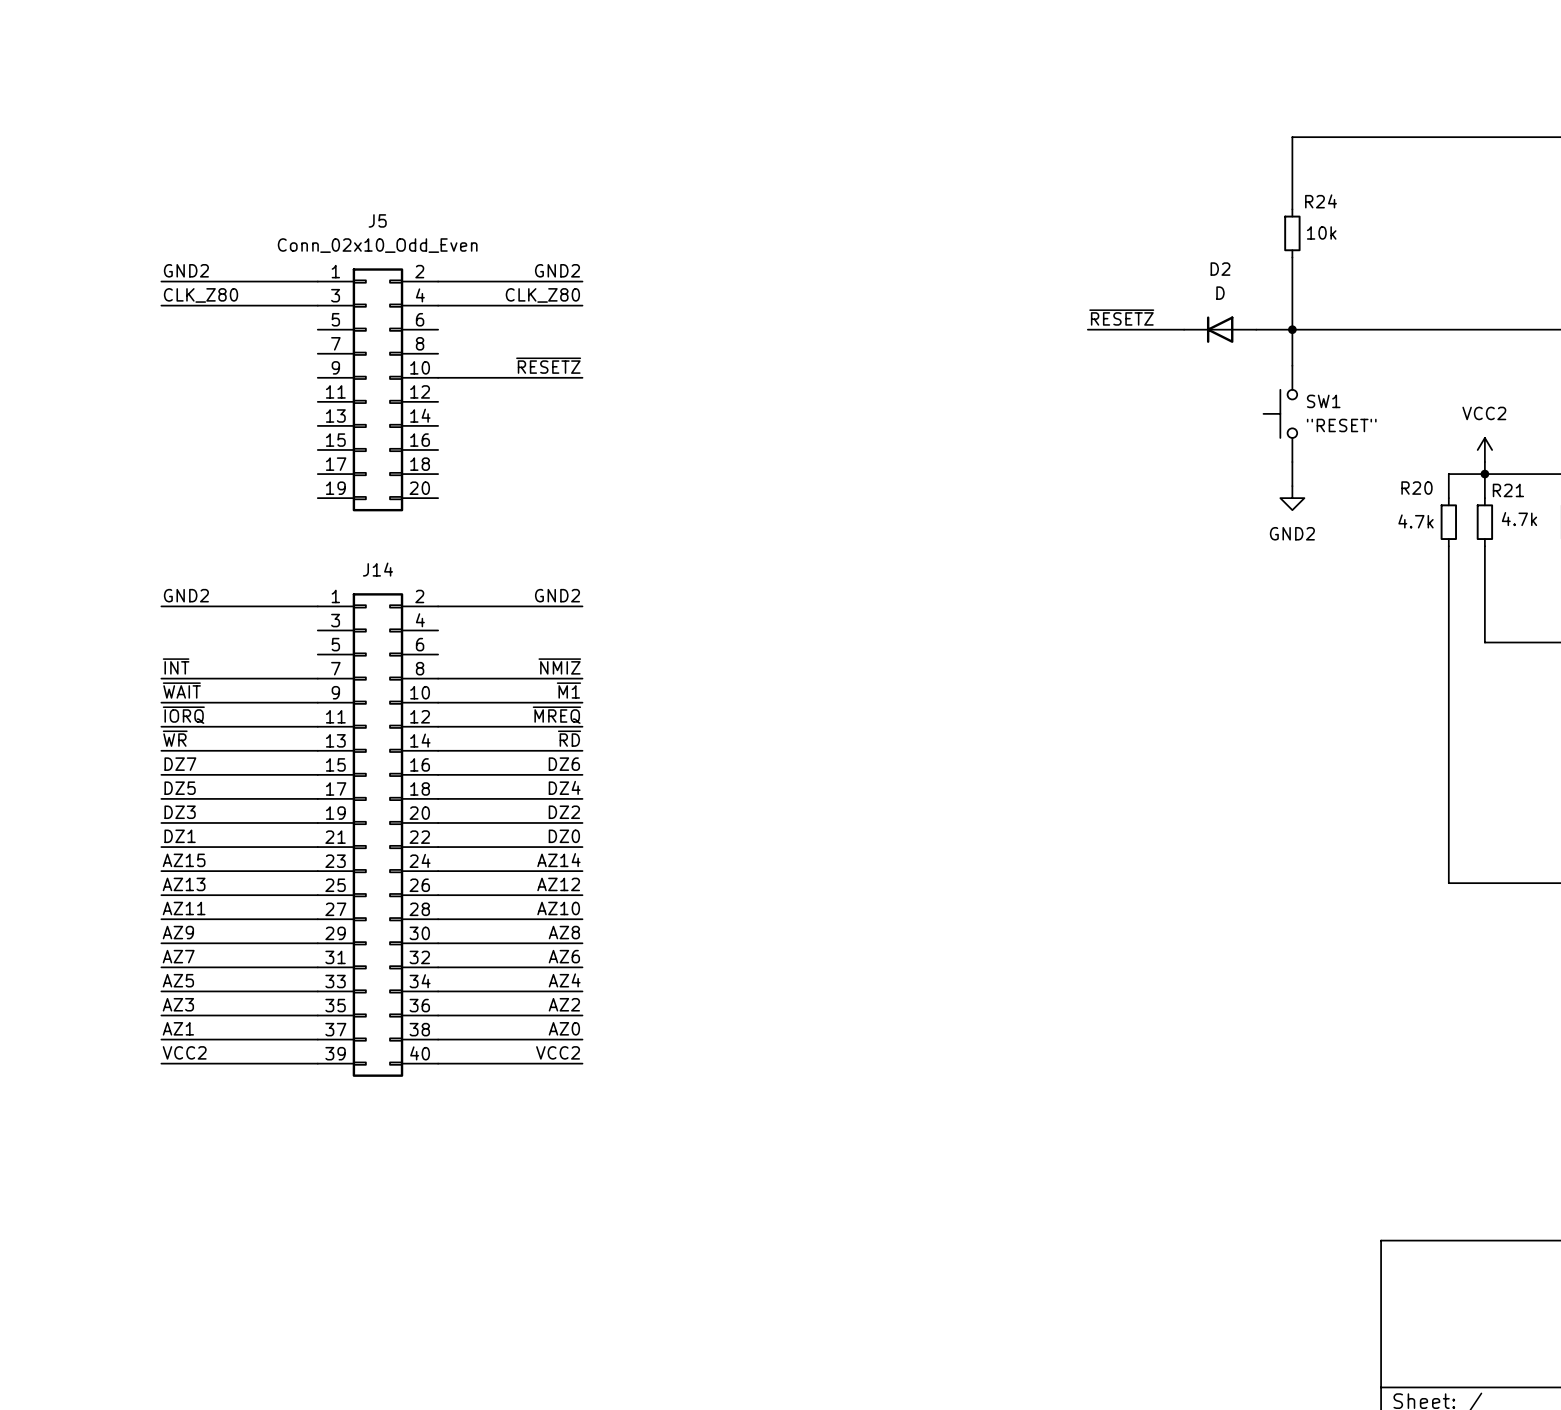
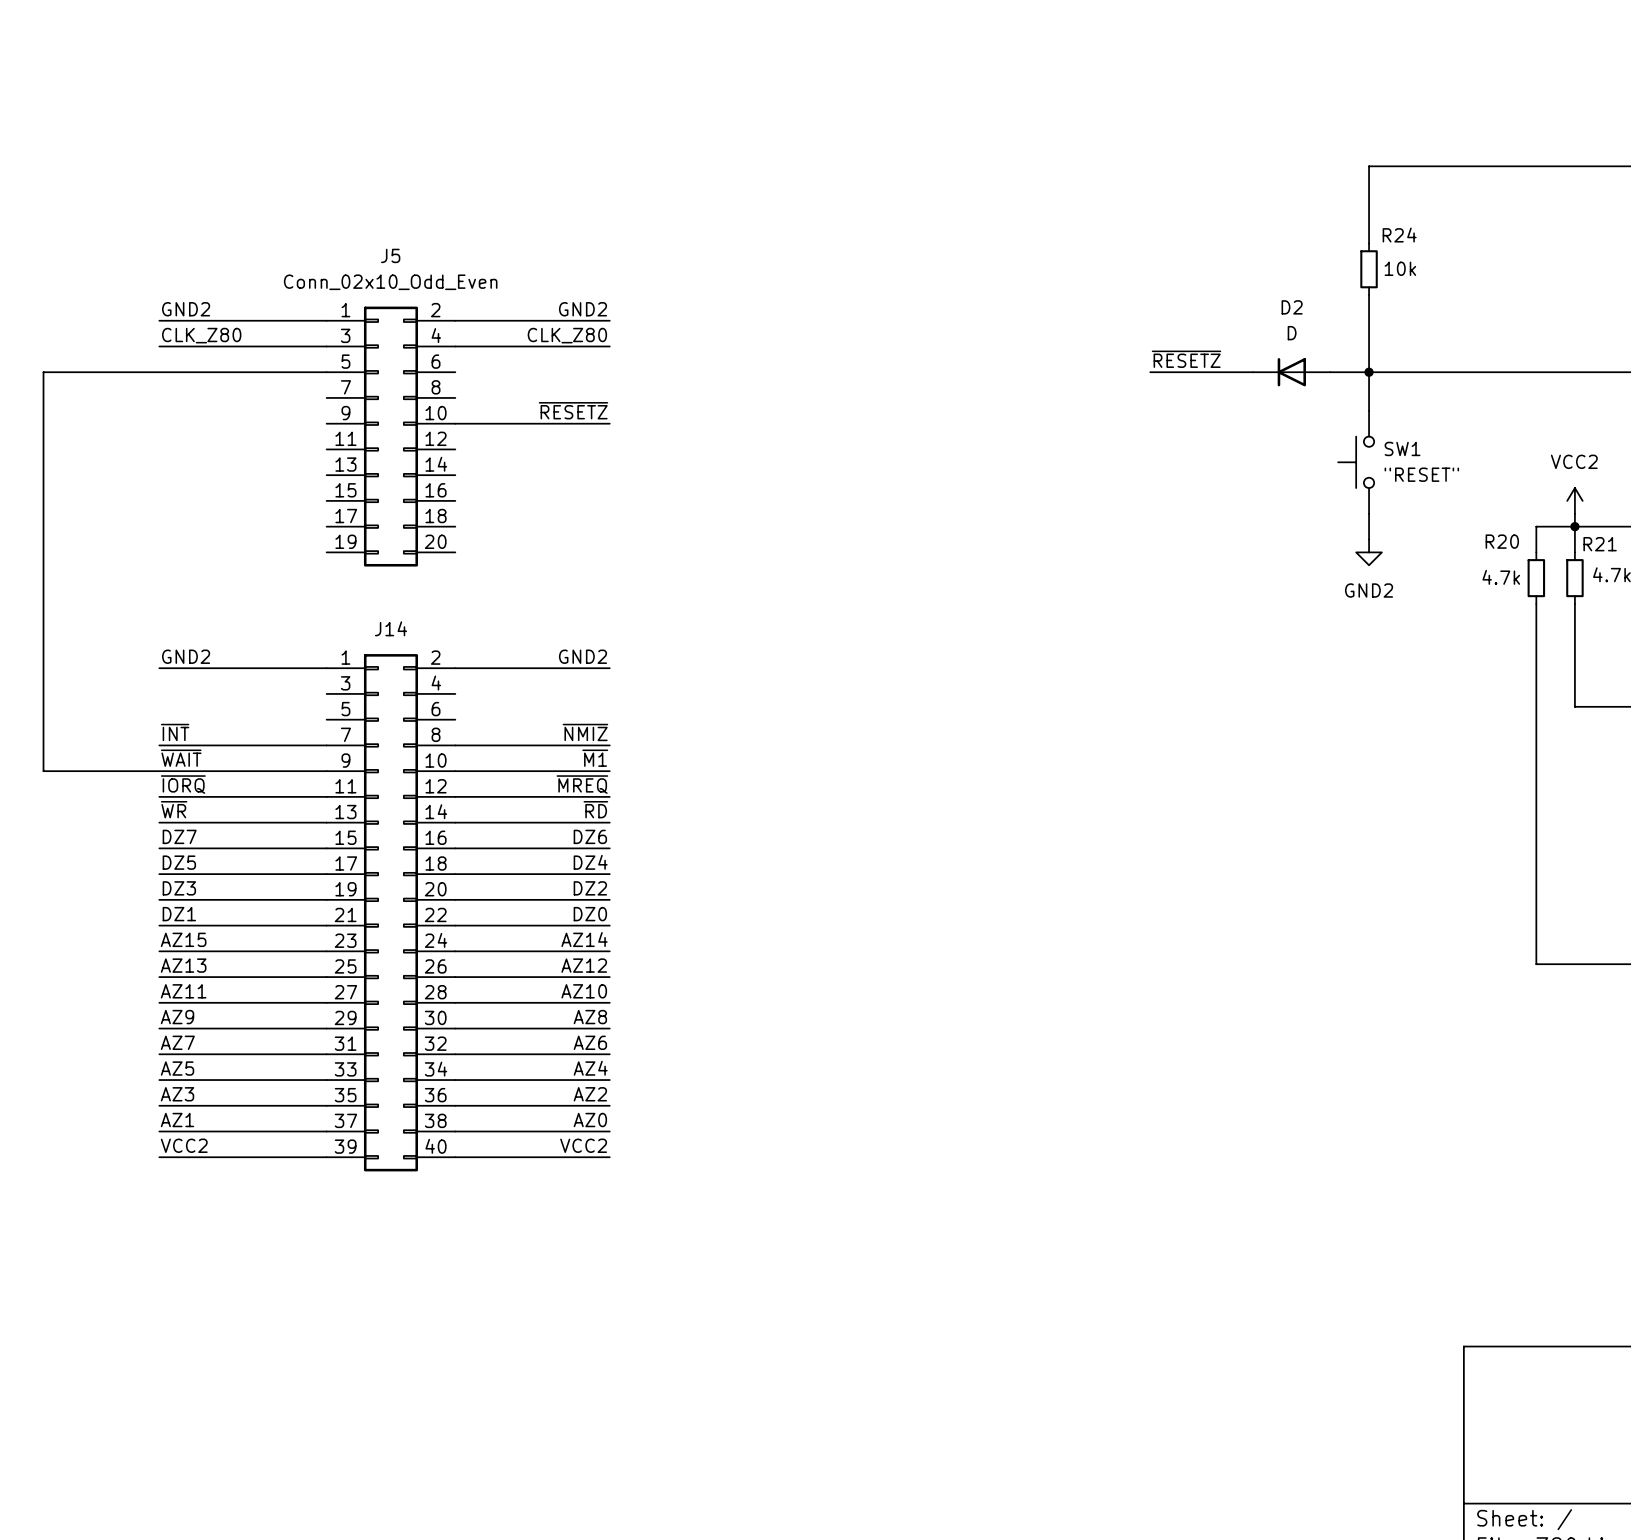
wire: none -> (326, 372) (43, 372) (43, 771) (159, 771)

